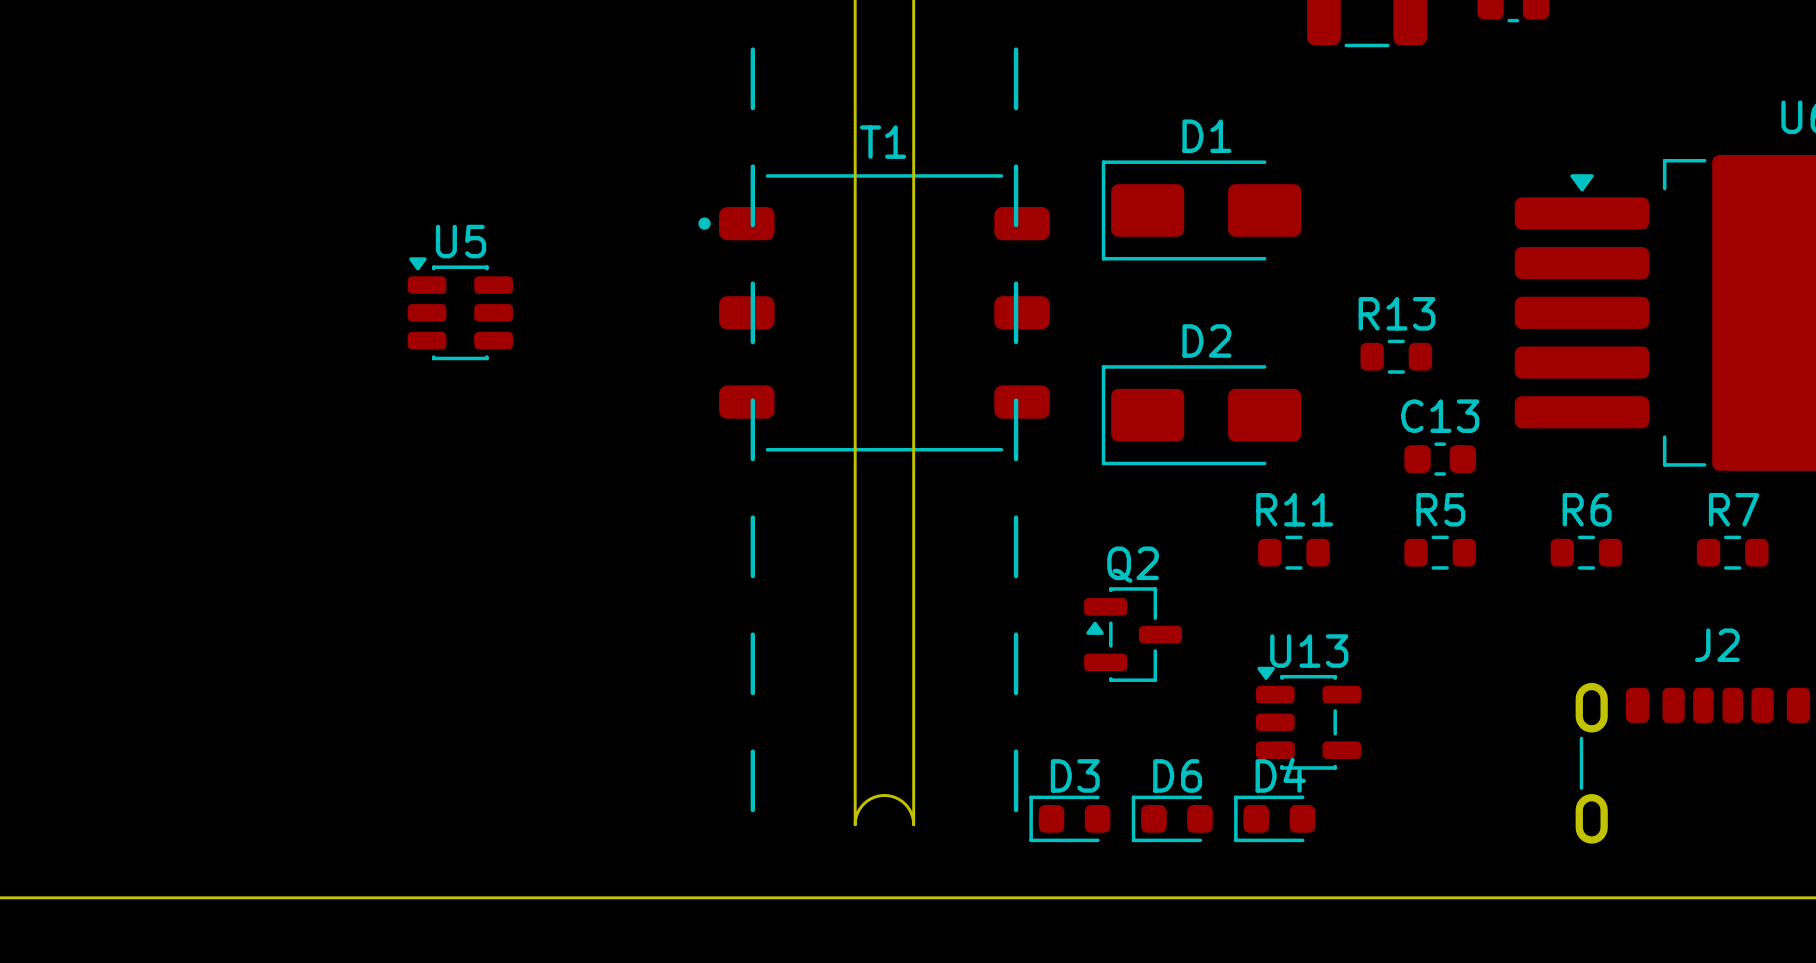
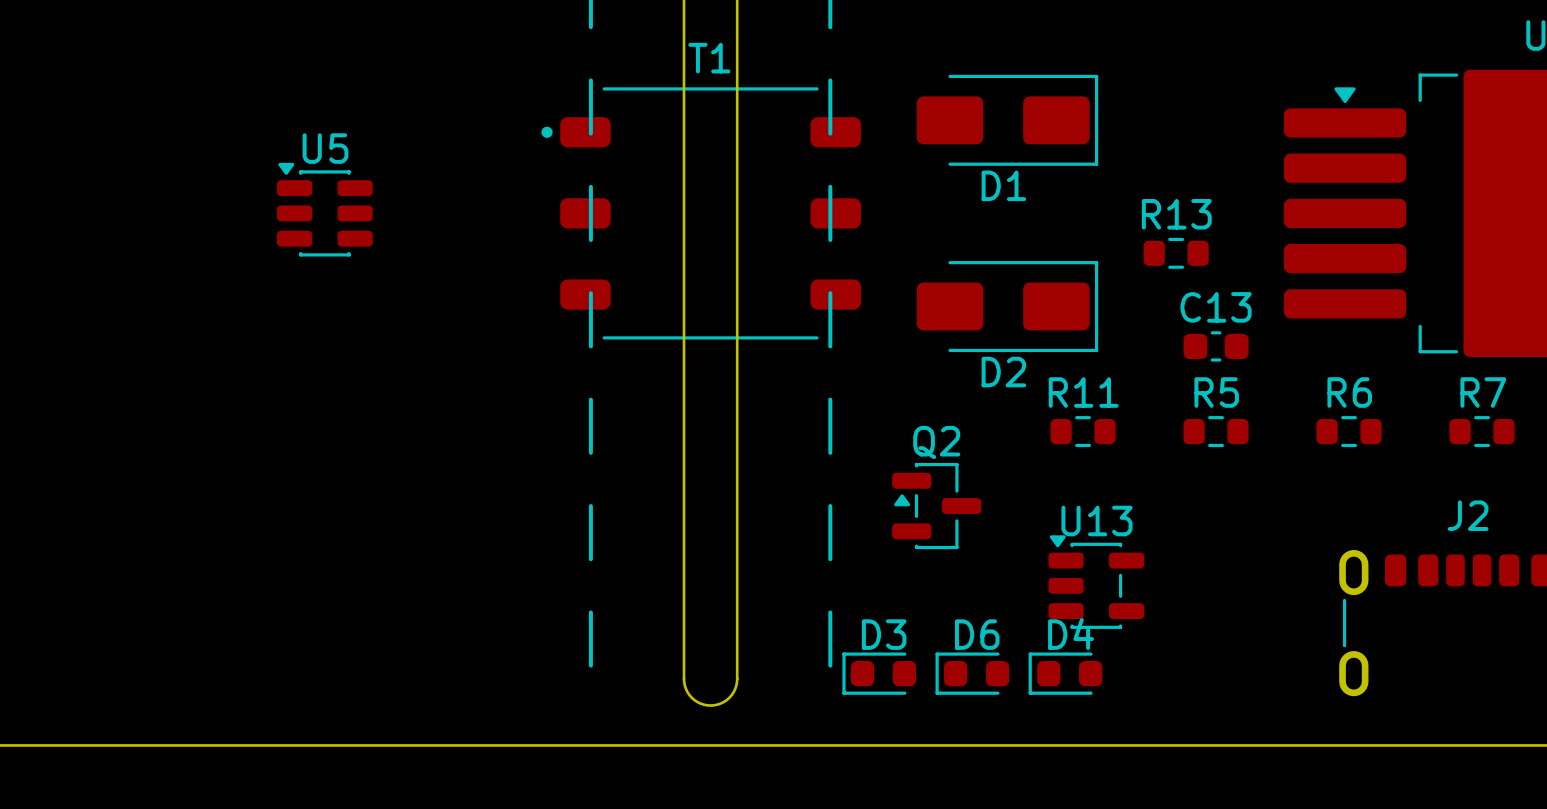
D1 rotation: 0° (1201, 210) -> 180° (1007, 120)
D2 rotation: 0° (1201, 415) -> 180° (1007, 306)
board edge: (855, 824) (857, 813) (863, 804) (873, 797) (884, 795) (895, 797) (905, 804) (911, 813) (913, 824) -> (684, 678) (686, 689) (691, 697) (700, 703) (710, 705) (720, 703) (729, 697) (735, 689) (737, 678)

